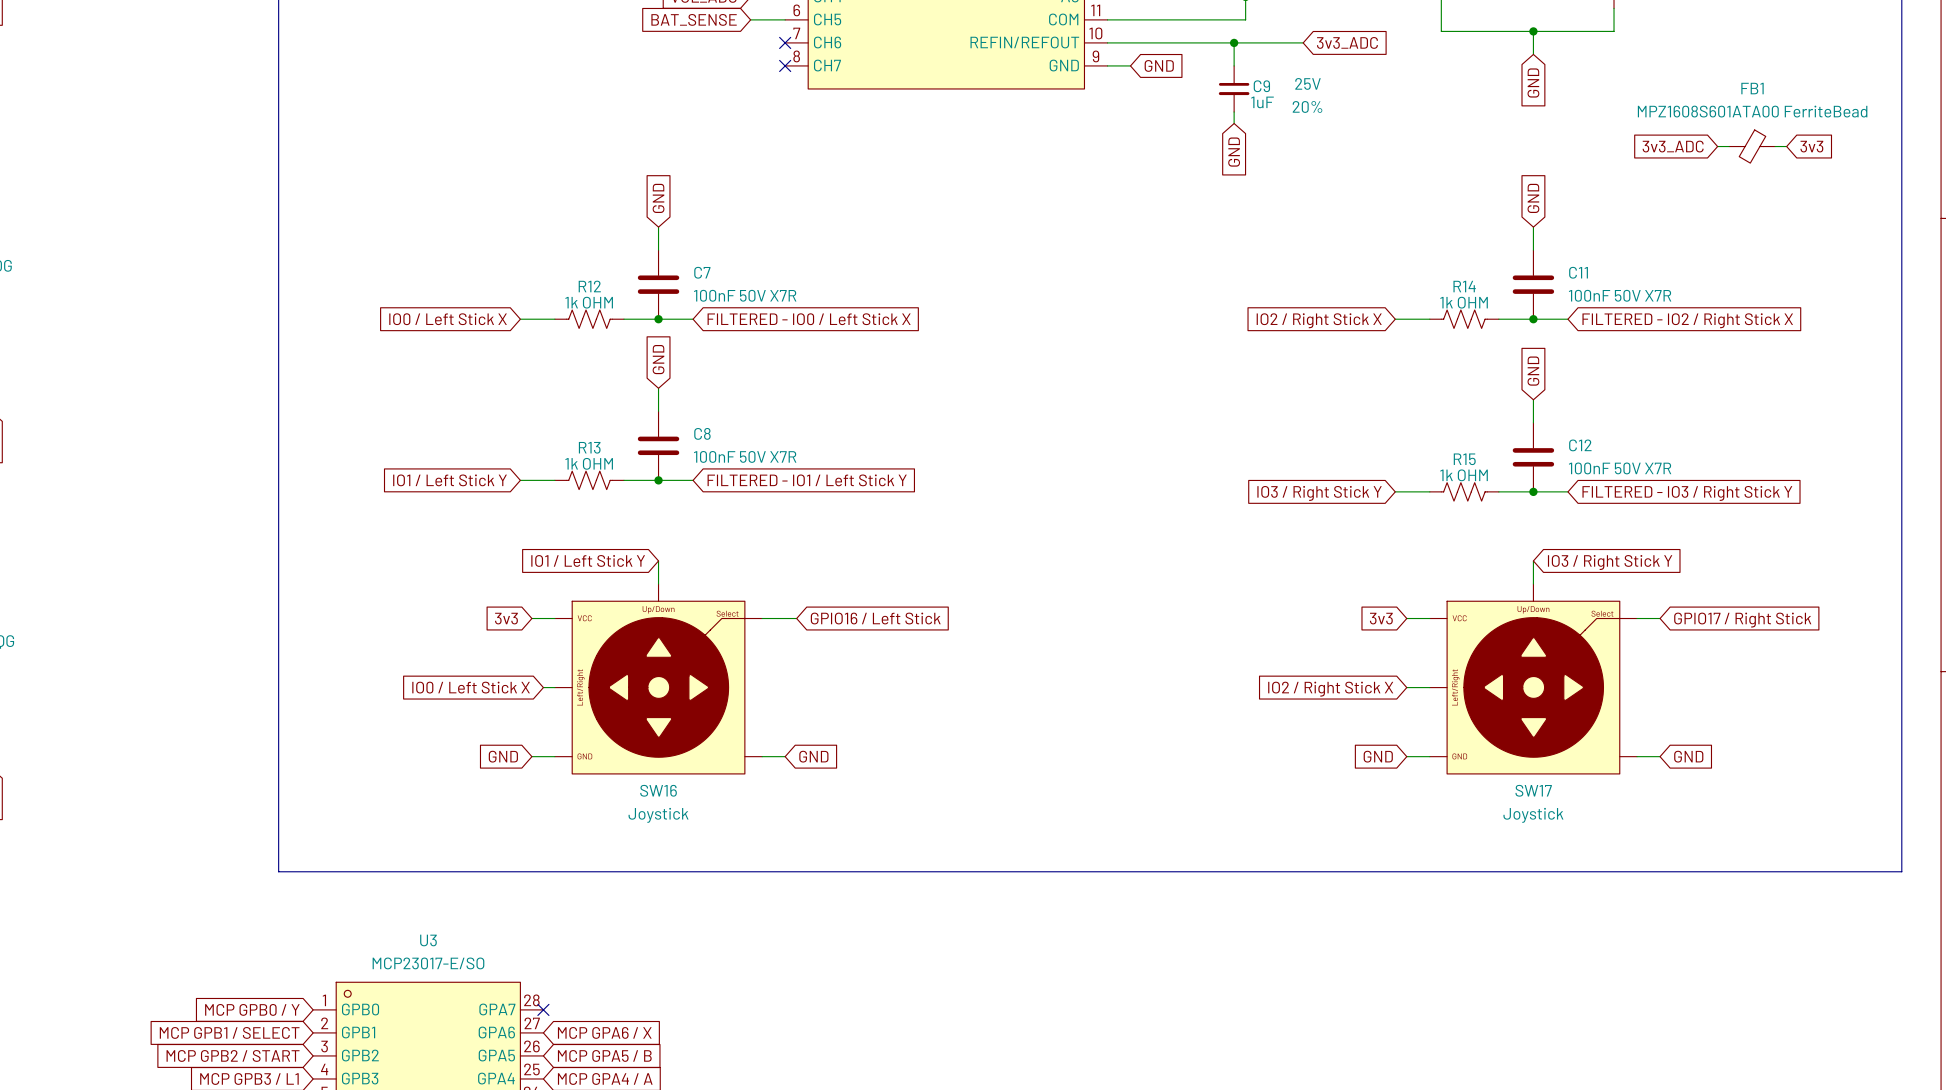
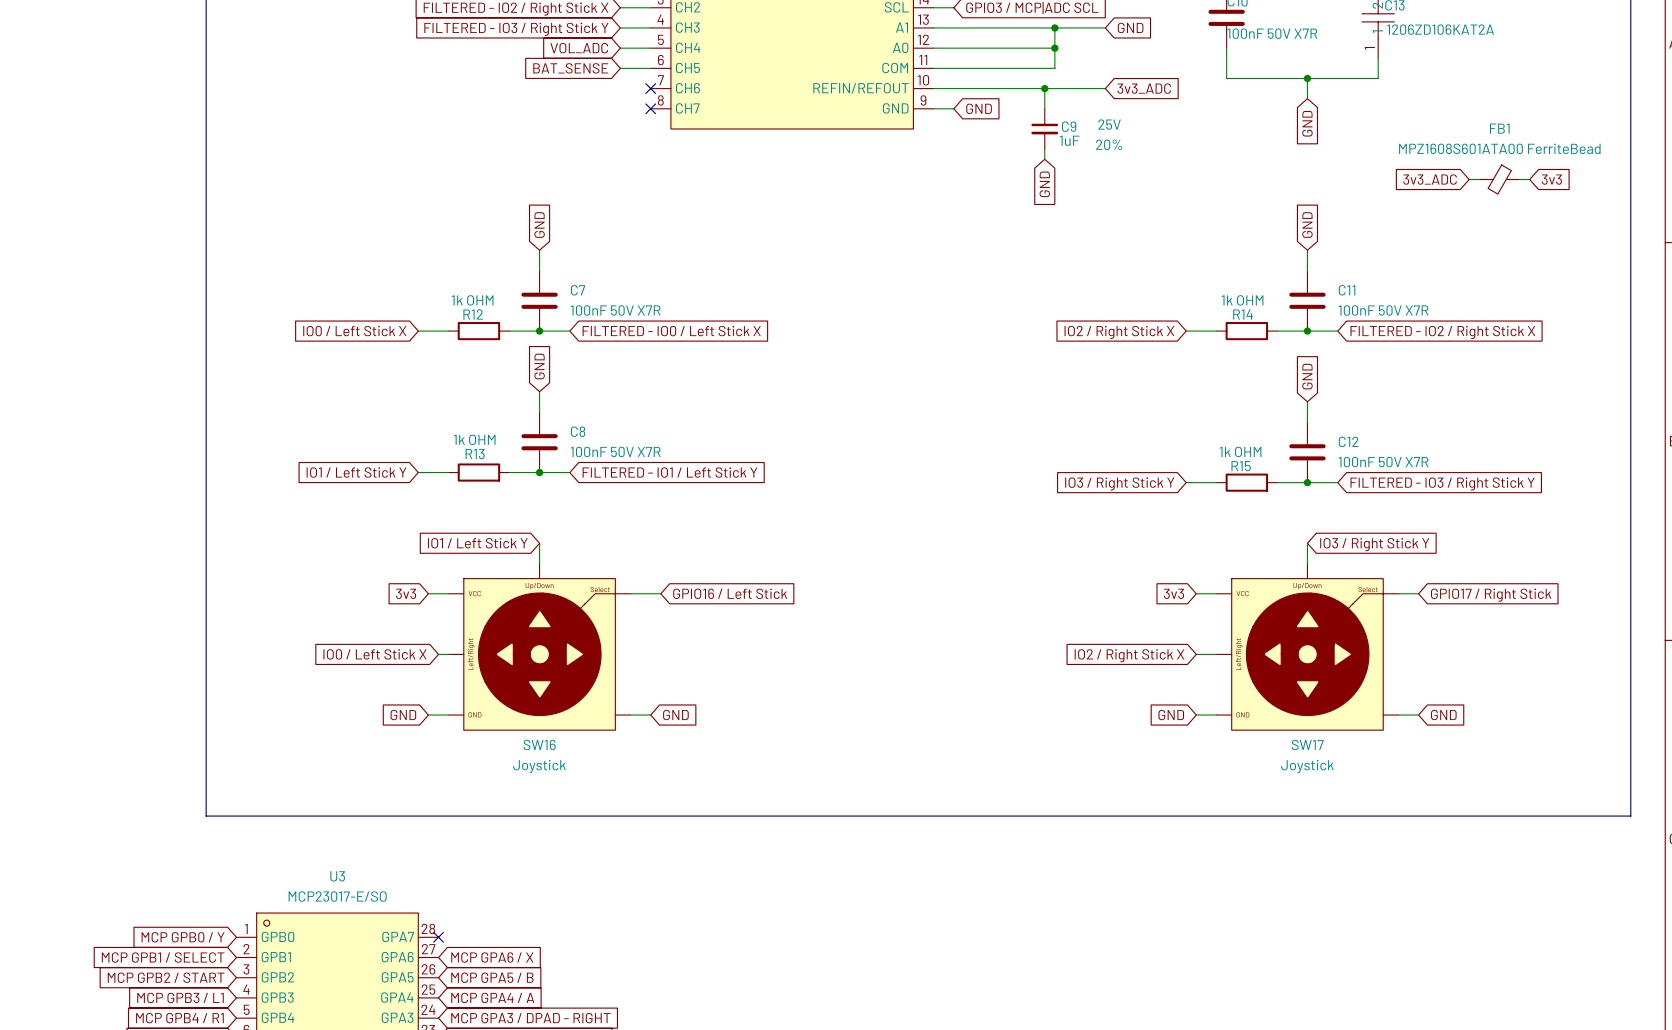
R12 value position: 1k OHM (589, 302) -> 1k OHM (472, 300)
R14 value position: 1k OHM (1464, 302) -> 1k OHM (1242, 300)
R12 symbol: [554, 310, 625, 329] -> [448, 321, 510, 341]
R14 symbol: [1429, 310, 1499, 329] -> [1216, 321, 1278, 341]
R13 value position: 1k OHM (589, 463) -> 1k OHM (474, 439)
R13 symbol: [554, 471, 625, 490] -> [448, 463, 510, 482]
R15 value position: 1k OHM (1464, 475) -> 1k OHM (1240, 451)
R15 symbol: [1429, 482, 1499, 502] -> [1216, 473, 1278, 492]

